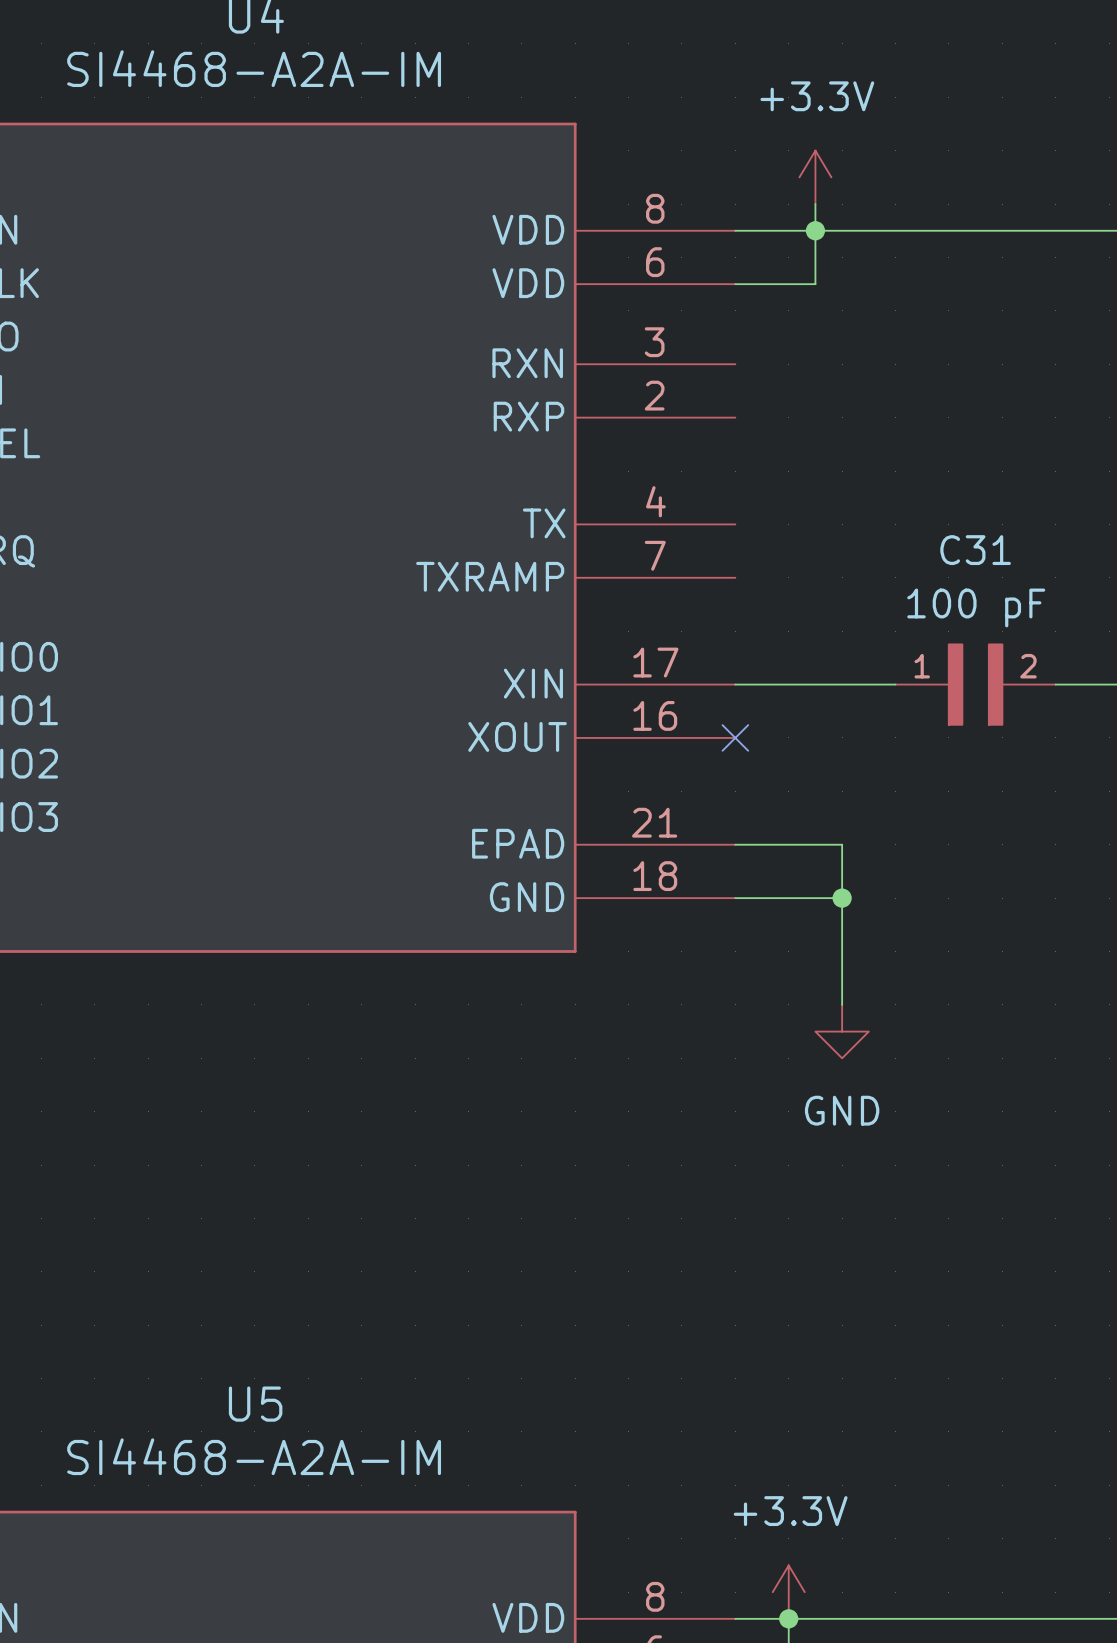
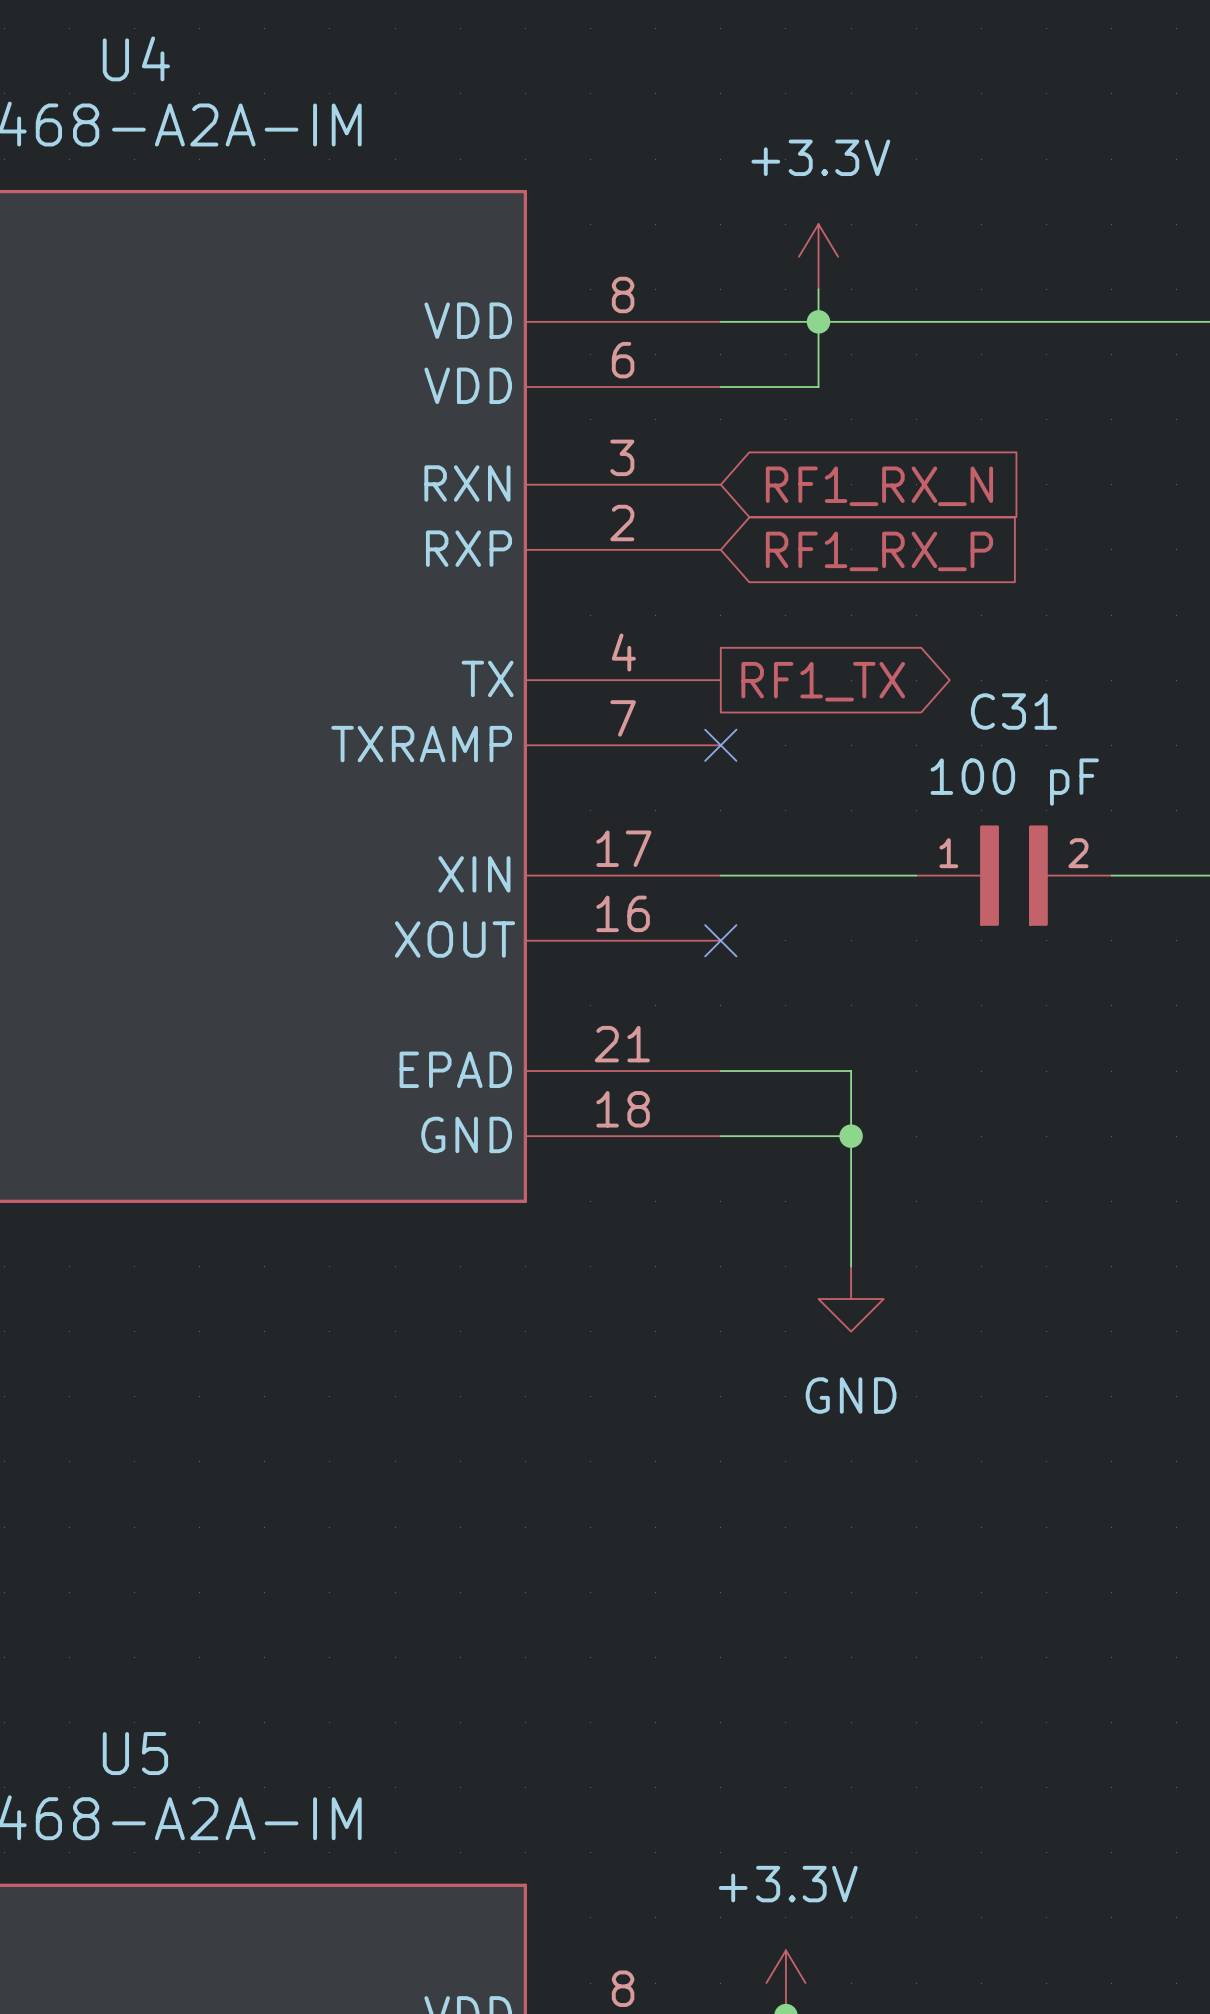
global label: none -> RF1_RX_N (879, 486)
global label: none -> RF1_RX_P (879, 551)
global label: none -> RF1_TX (823, 681)
no-connect mark: none -> (720, 745)

